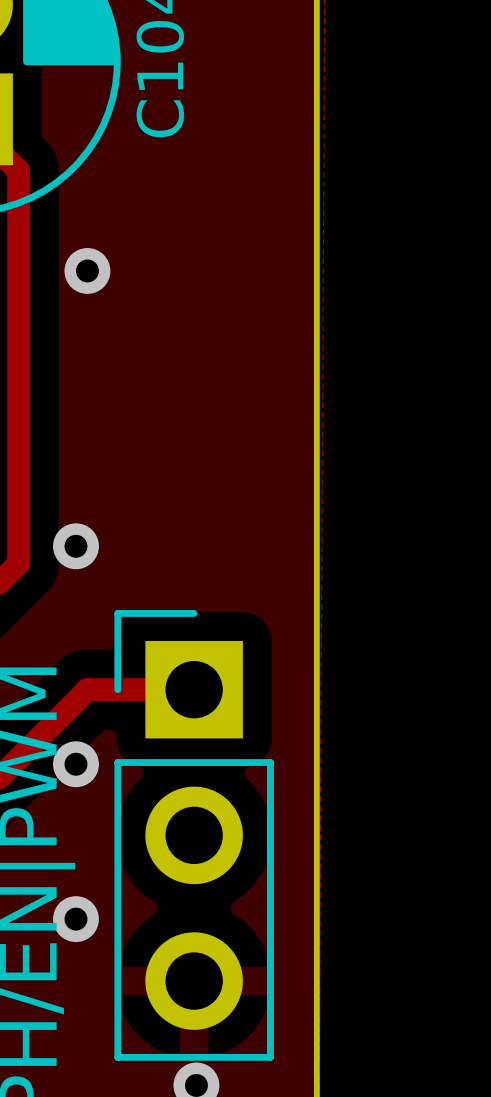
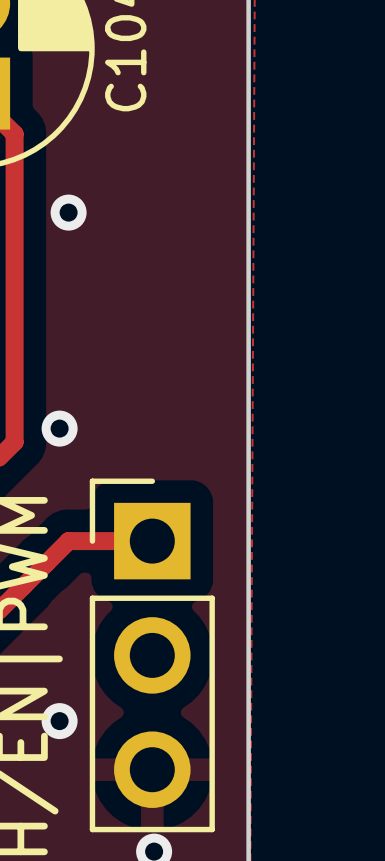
via: (75, 764) -> none

